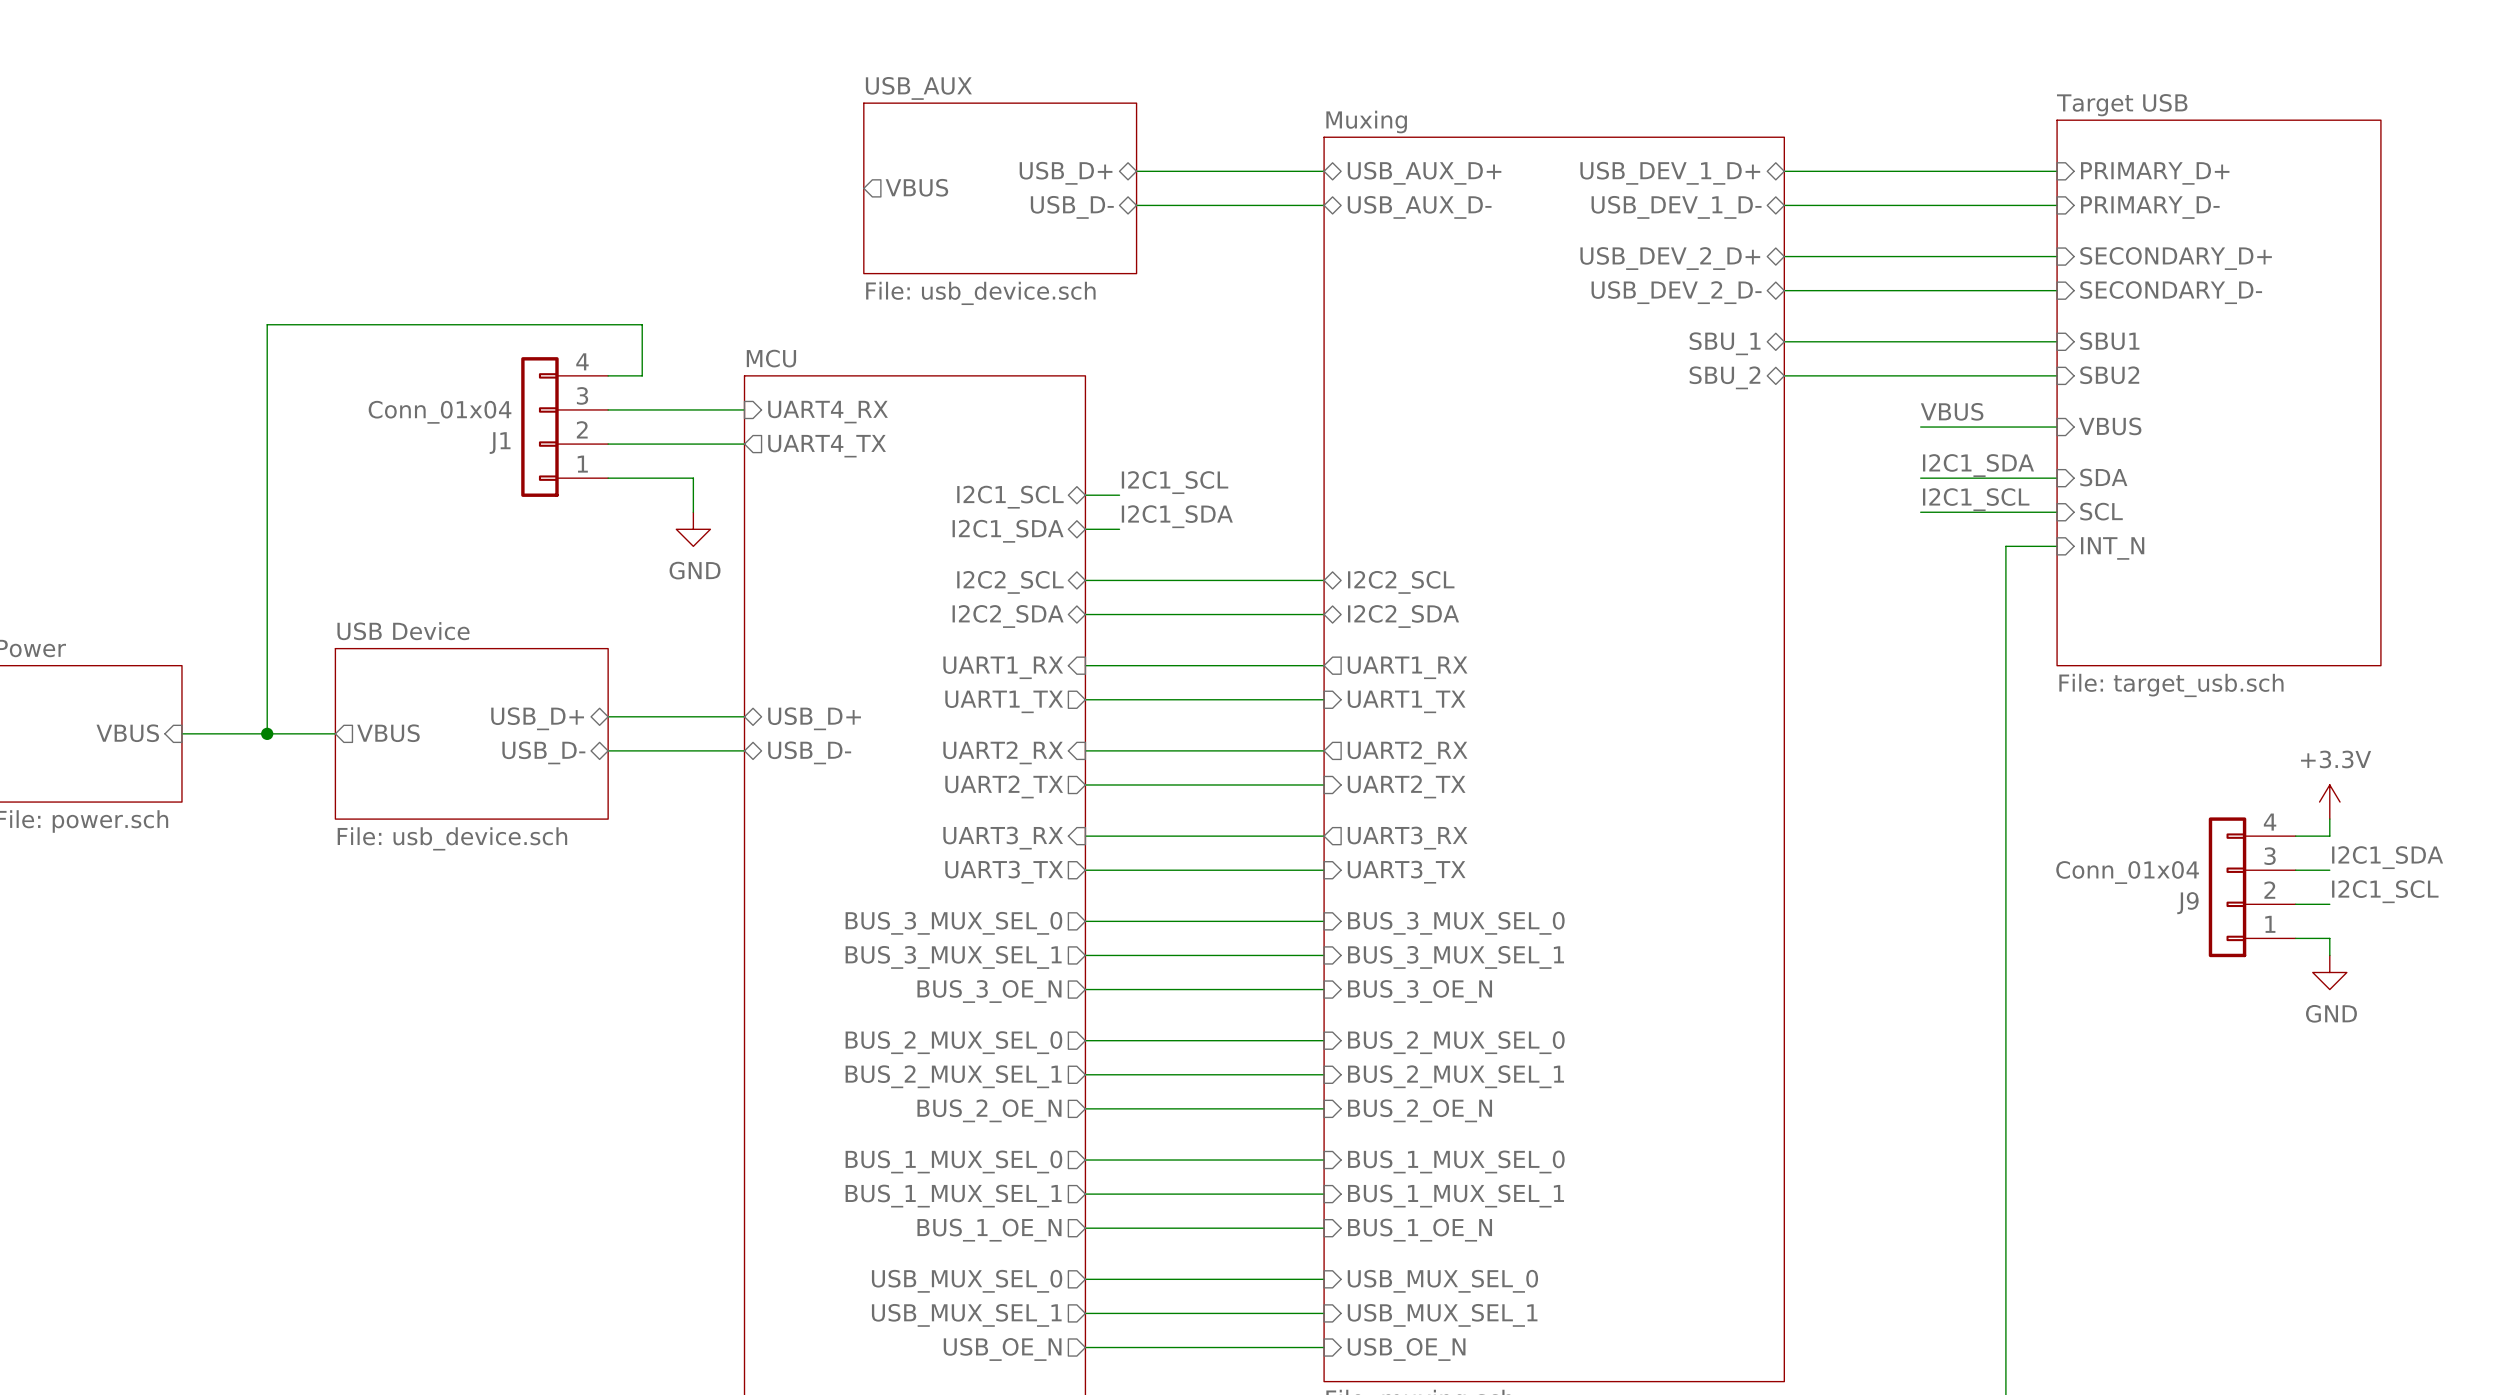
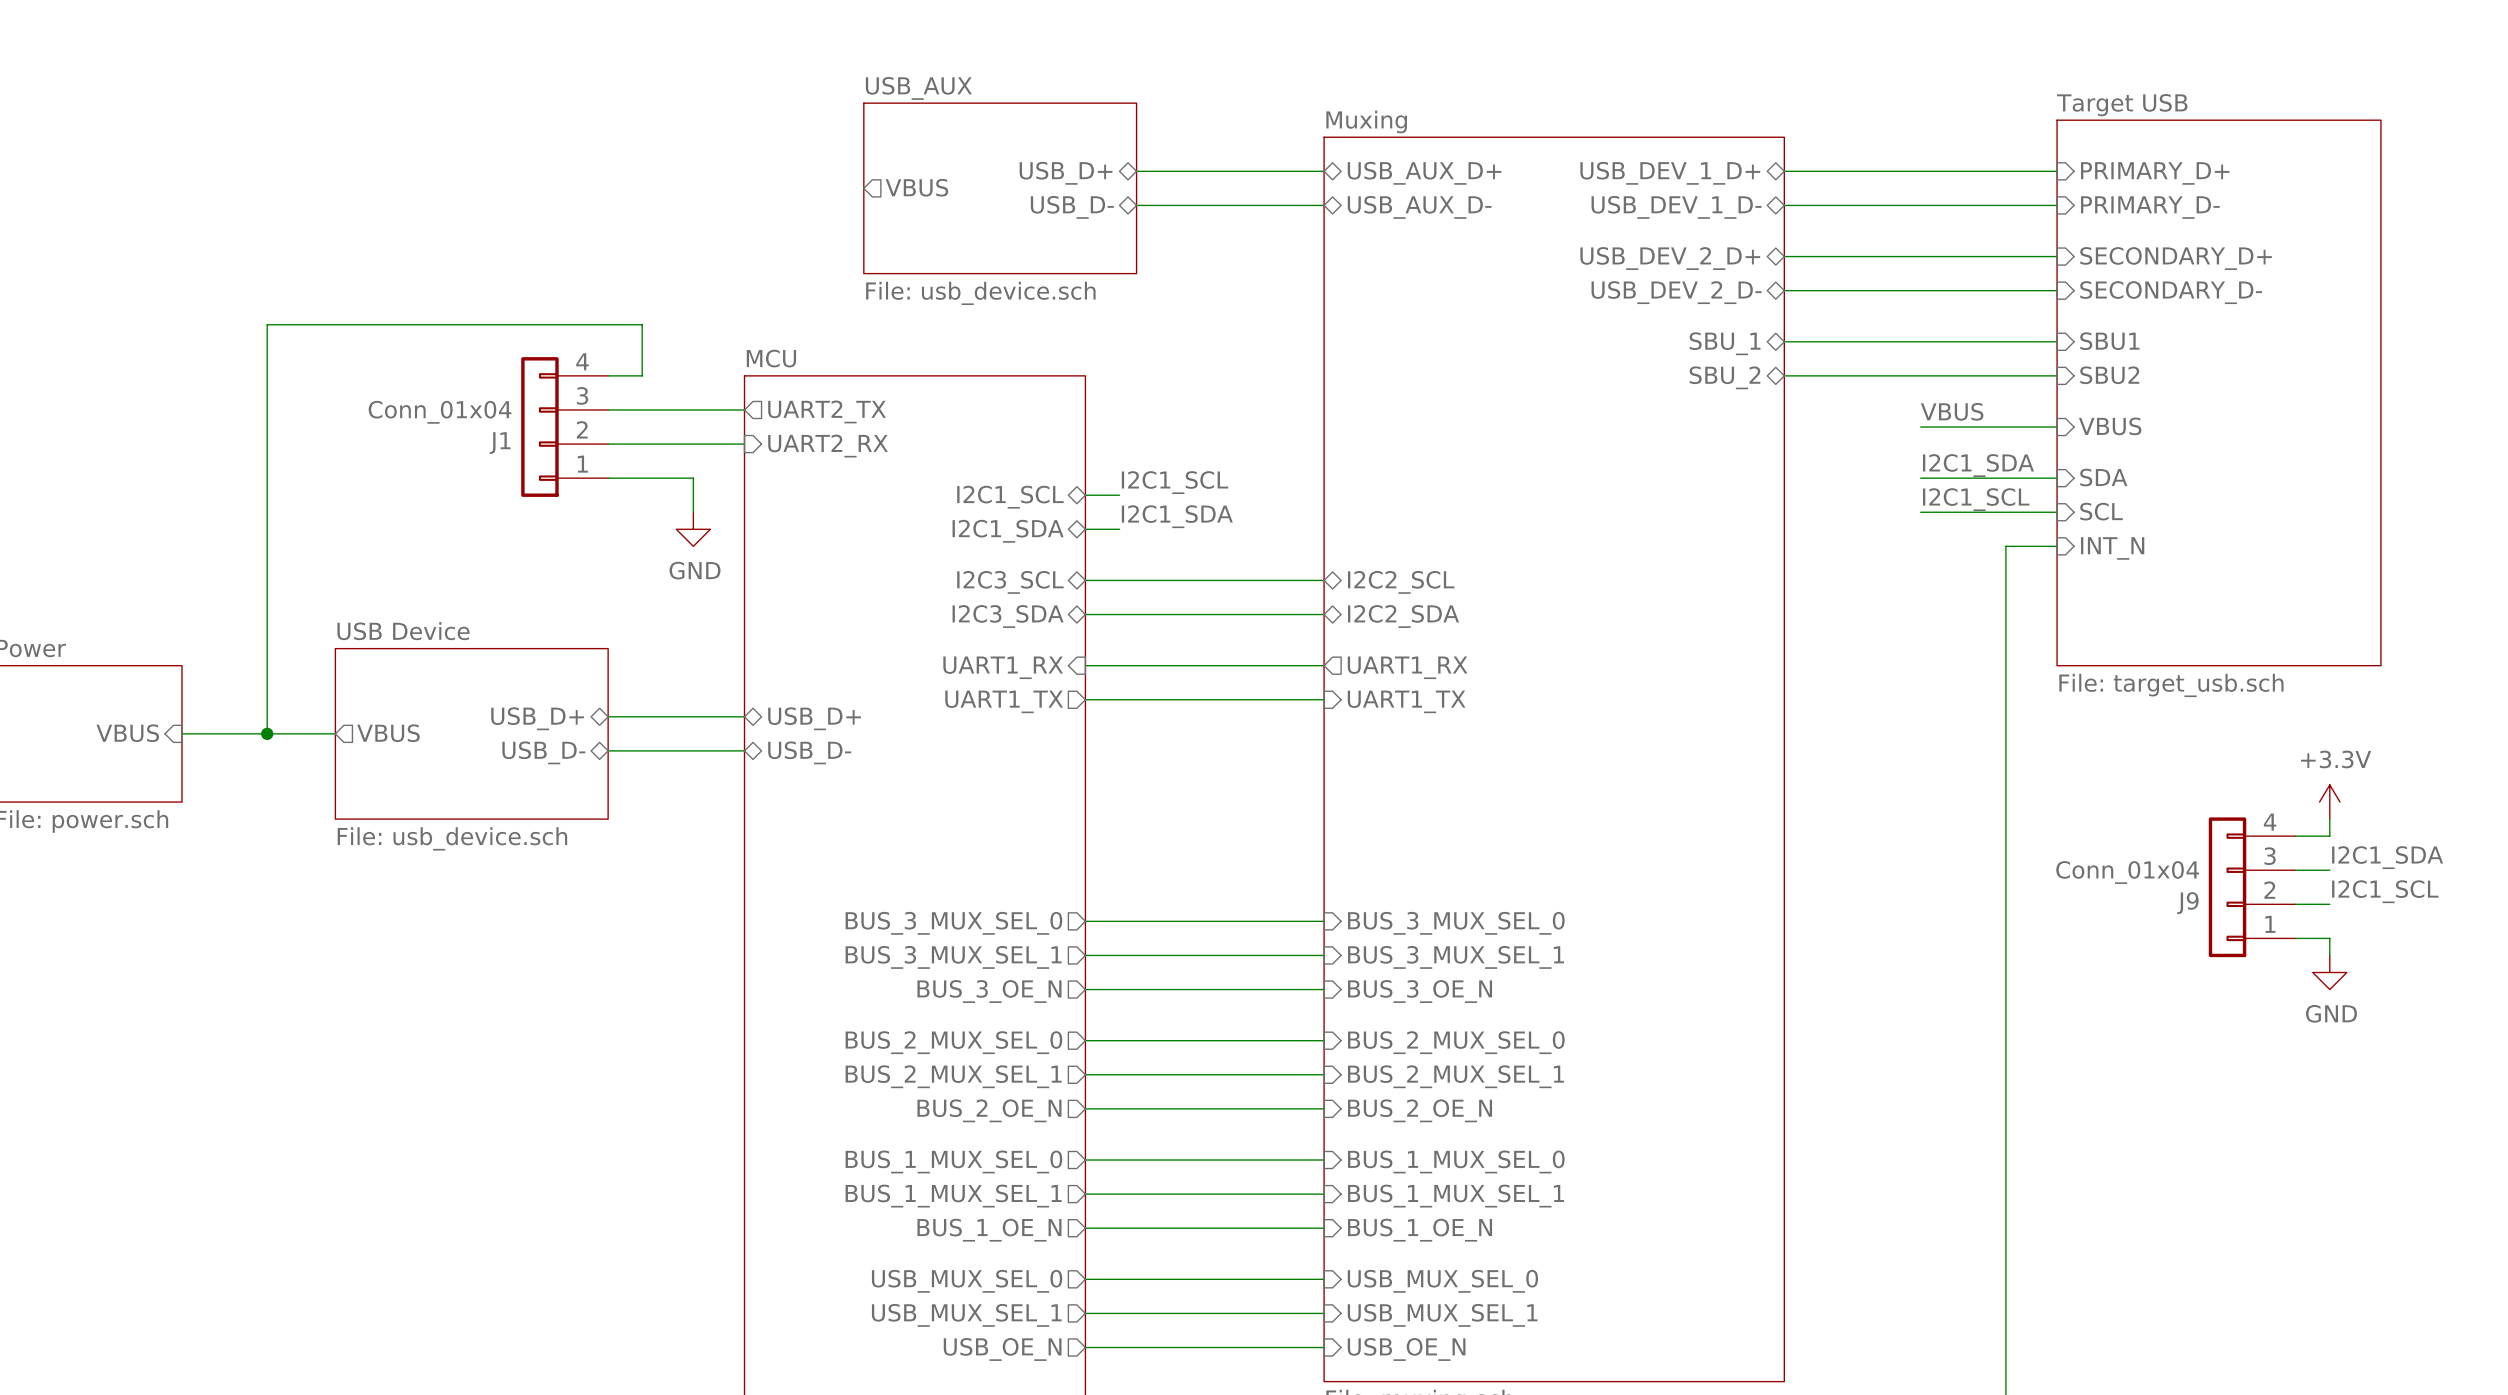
sheet pin shape: input (828, 412) -> output (827, 411)
sheet pin: UART4_RX (828, 412) -> UART2_TX (827, 411)
sheet pin shape: output (827, 446) -> input (828, 446)
sheet pin: UART4_TX (827, 446) -> UART2_RX (828, 446)
sheet pin: I2C2_SCL (1010, 582) -> I2C3_SCL (1010, 582)
sheet pin: I2C2_SDA (1008, 616) -> I2C3_SDA (1008, 616)
wire: (1085, 750) (1324, 750) -> none
sheet pin: UART2_RX (1003, 752) -> none
sheet pin: UART2_RX (1407, 752) -> none
wire: (1085, 784) (1324, 784) -> none
sheet pin: UART2_TX (1004, 786) -> none
sheet pin: UART2_TX (1406, 786) -> none
wire: (1085, 836) (1324, 836) -> none
sheet pin: UART3_RX (1003, 838) -> none
sheet pin: UART3_RX (1407, 838) -> none
wire: (1085, 870) (1324, 870) -> none
sheet pin: UART3_TX (1004, 872) -> none
sheet pin: UART3_TX (1406, 872) -> none

